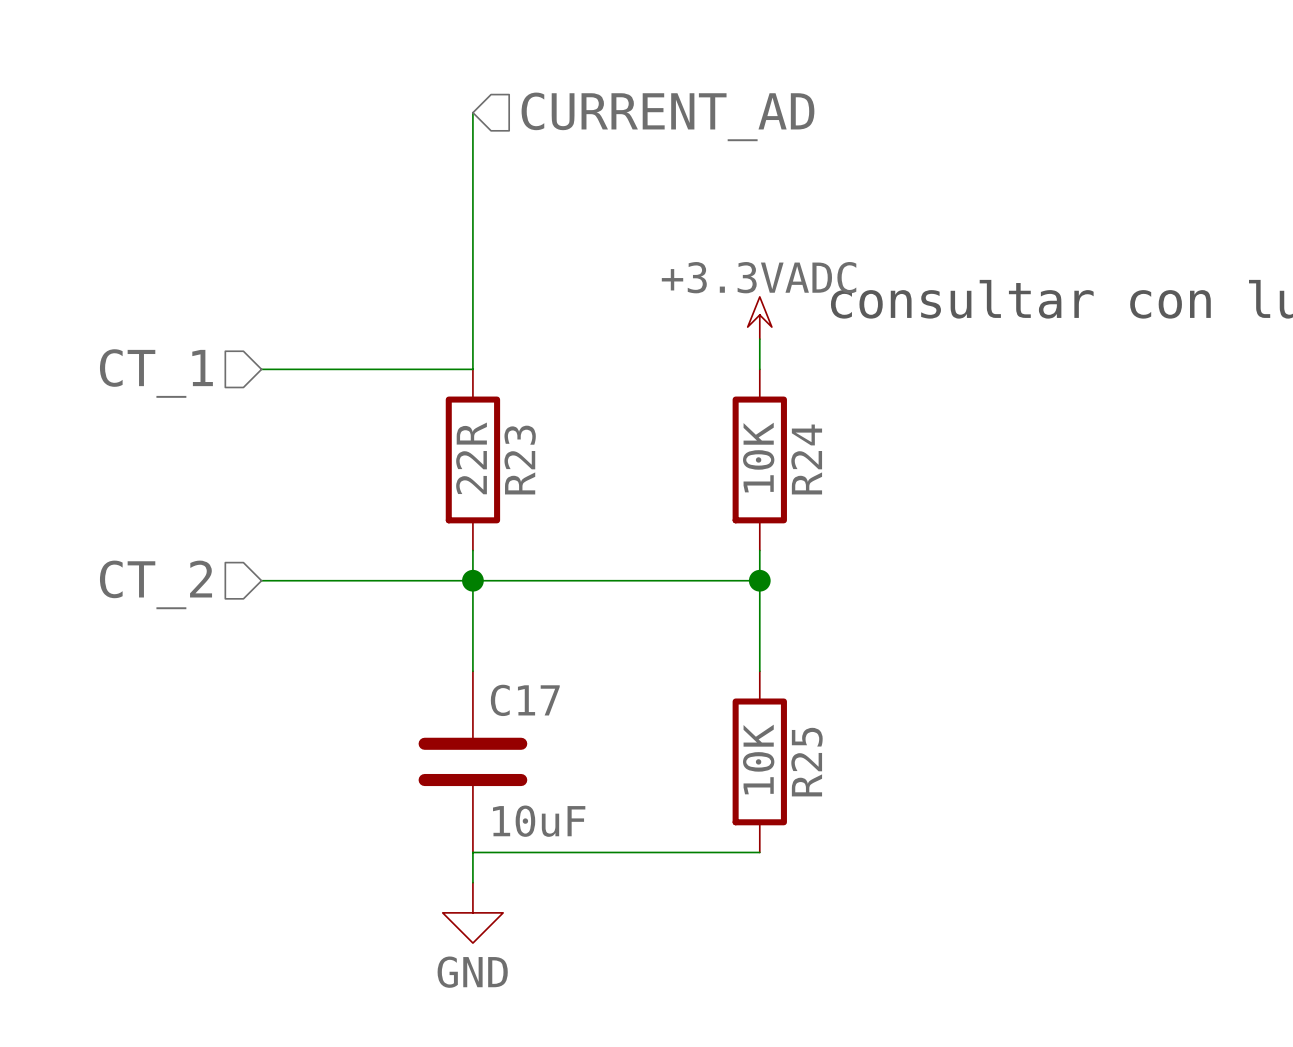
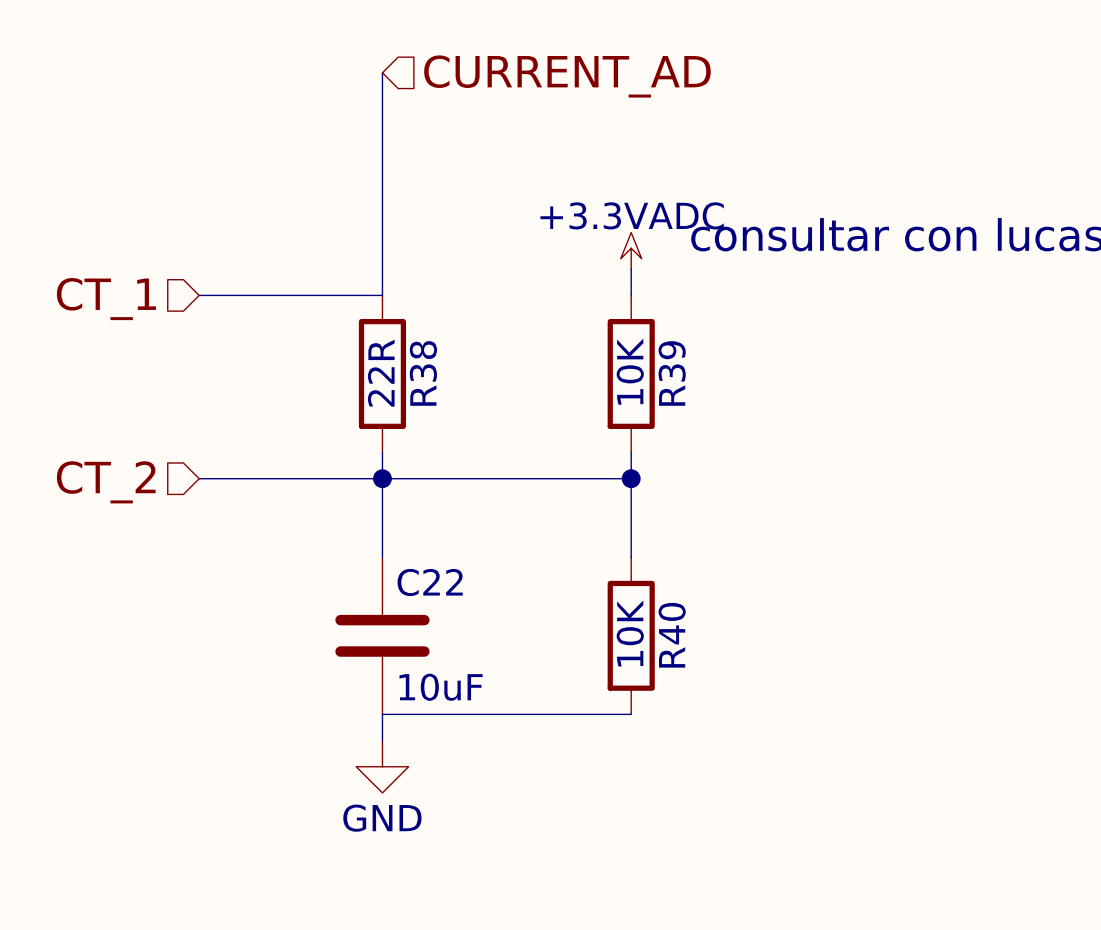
R24 name: R24 (806, 459) -> R39 (672, 373)
R23 name: R23 (520, 460) -> R38 (423, 373)
C17 name: C17 (525, 700) -> C22 (430, 582)
R25 name: R25 (806, 762) -> R40 (672, 635)

